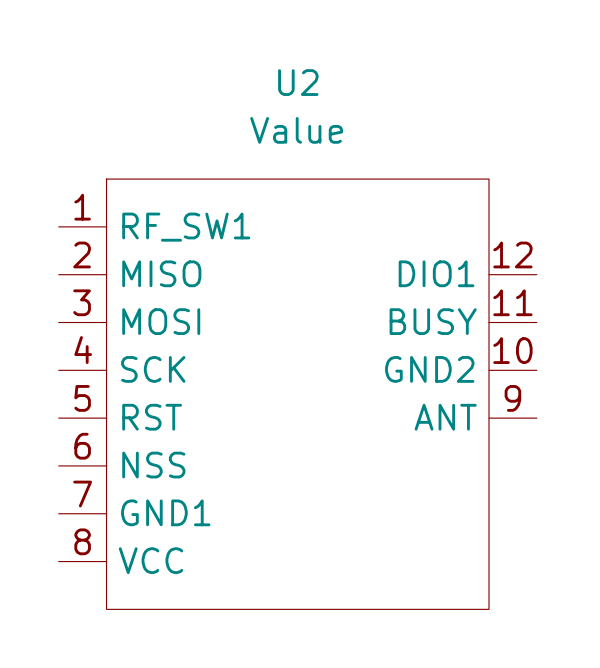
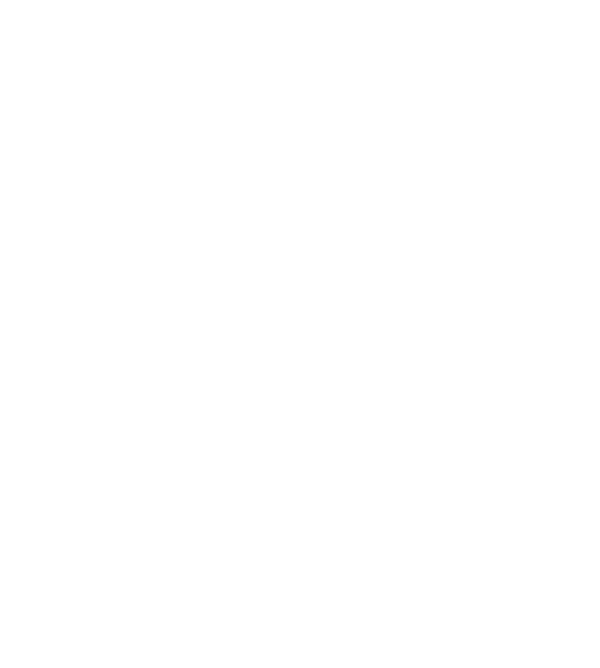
U2: Value (297, 394) -> none

